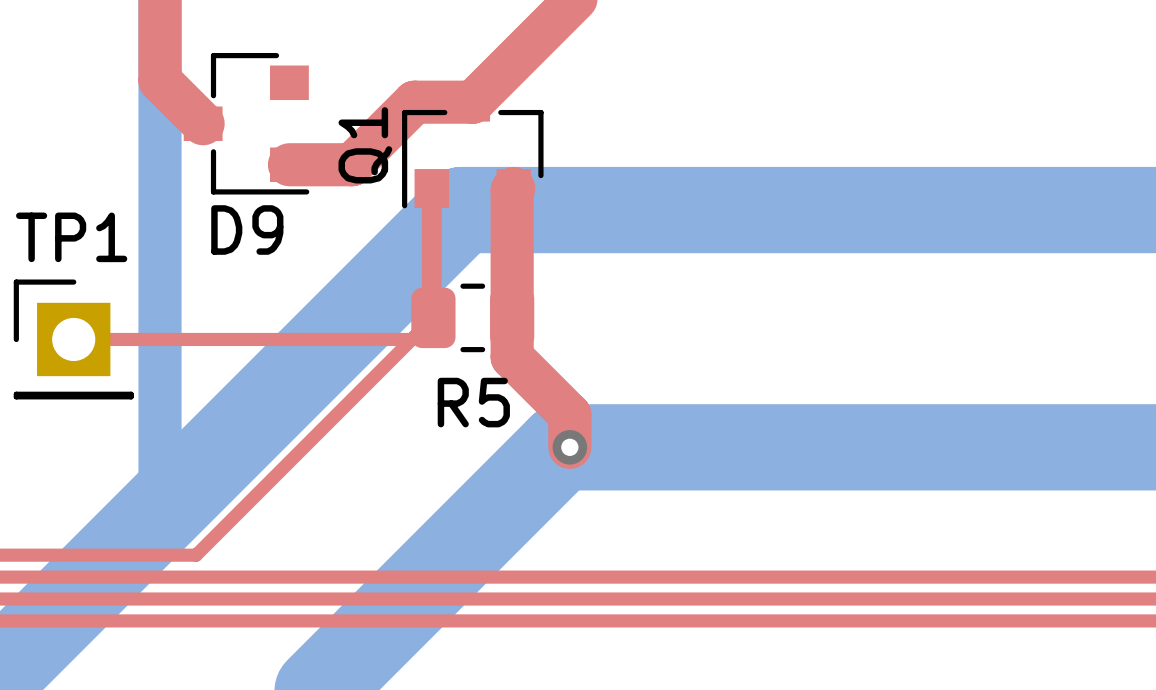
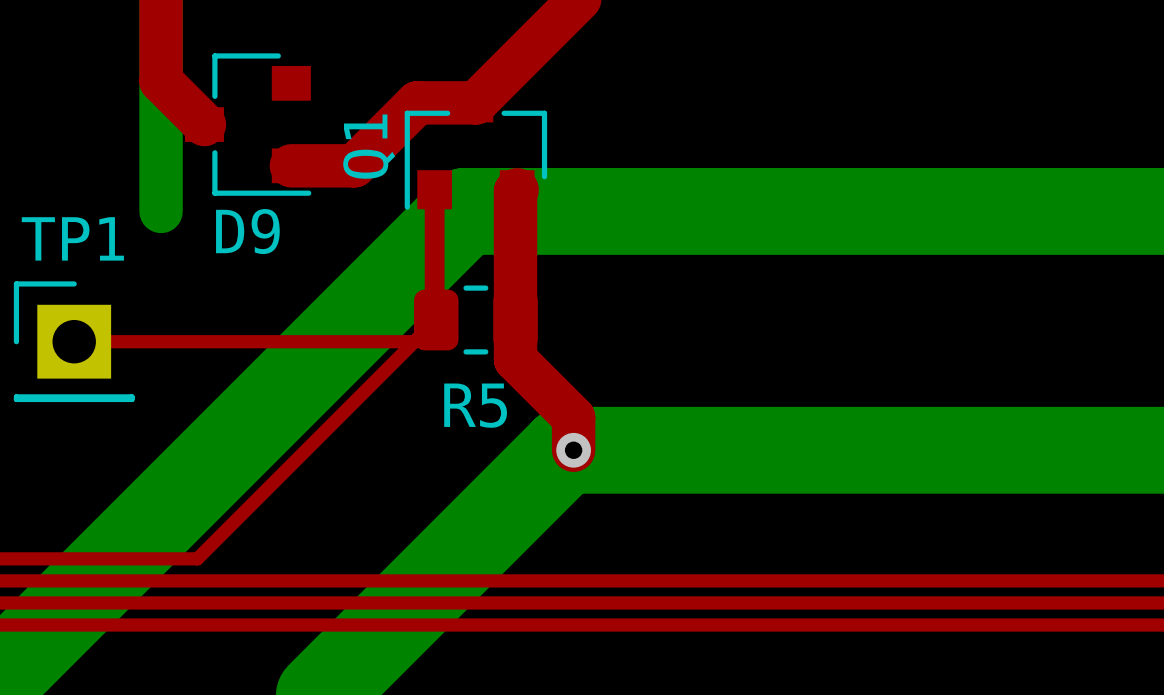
bottom track: (160, 210) (160, 494) -> none

